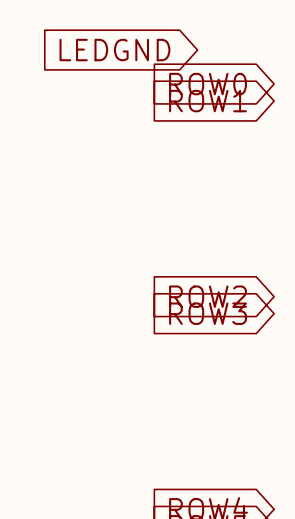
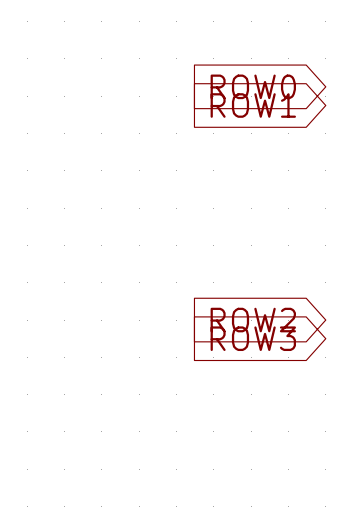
global label: LEDGND (114, 50) -> none

